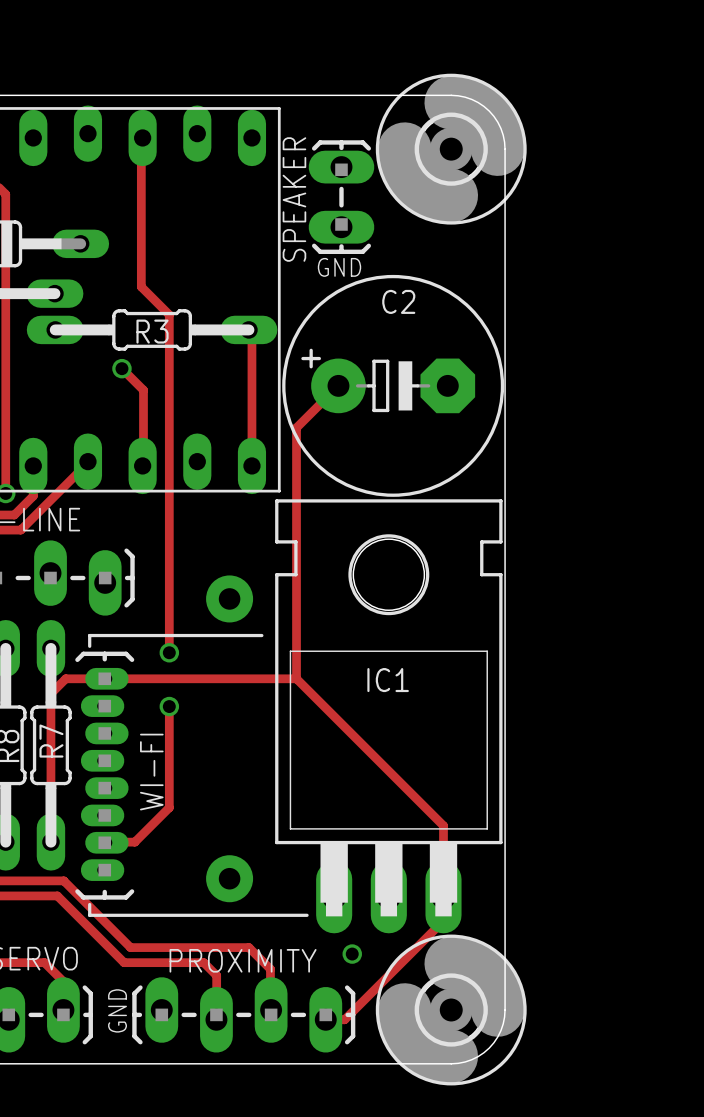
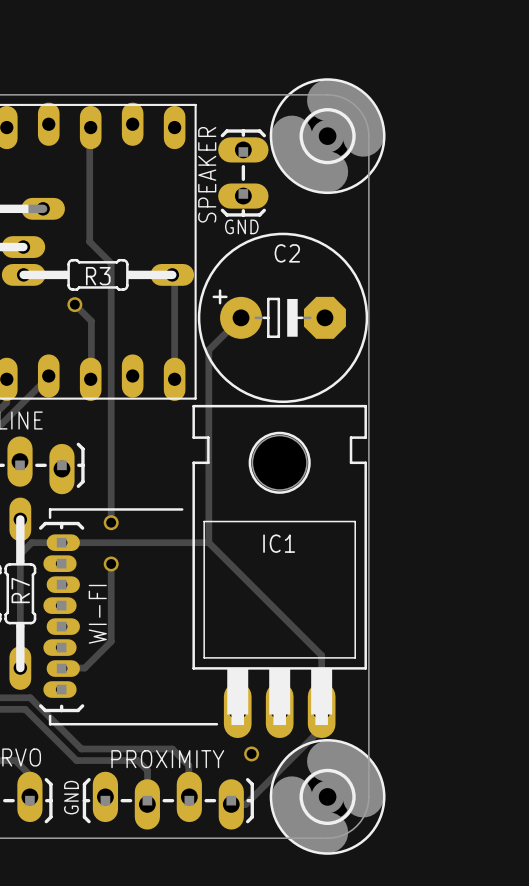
via: (229, 598) -> none
via: (229, 878) -> none

